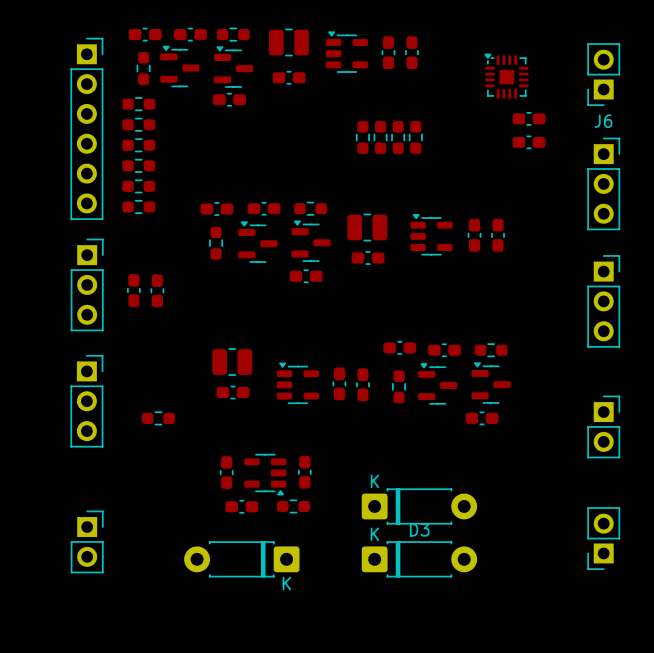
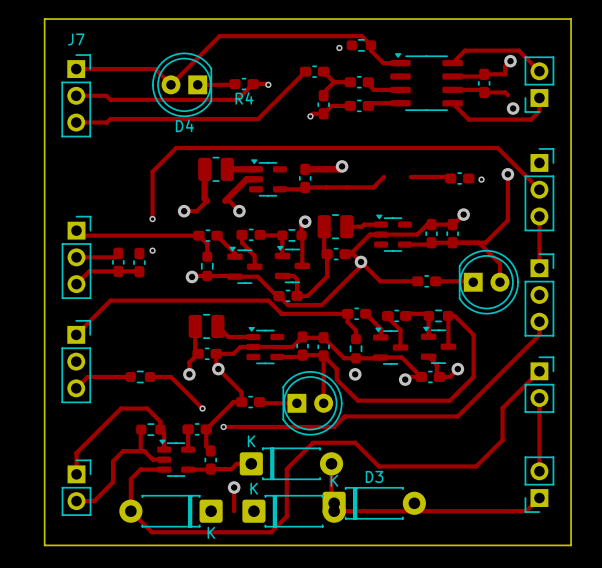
board edge: none -> (44, 19) (571, 19) (571, 545) (44, 545) (44, 19)
part: (145, 34) -> none
part: (190, 34) -> none
part: (233, 34) -> none
part footprint: [405, 36, 419, 70] -> [346, 39, 377, 52]
part: (288, 42) -> none
via: none -> (339, 47)
part: (346, 52) -> none
part: (388, 52) -> none
part: (179, 66) -> none
track: none -> (510, 61) (505, 66) (505, 74) (452, 76)
via: none -> (510, 61)
part: (233, 67) -> none
part: (143, 68) -> none
track: none -> (400, 63) (383, 63) (371, 50) (371, 45) (361, 36) (219, 36) (170, 84) (155, 69) (76, 69)
track: none -> (452, 63) (465, 50) (518, 50) (539, 71)
part position: (603, 74) -> (539, 84)
part: (506, 76) -> none
part: (289, 77) -> none
track: none -> (305, 71) (258, 119) (110, 119) (106, 122) (76, 122)
part: none -> (314, 71)
track: none -> (323, 71) (334, 82)
track: none -> (334, 82) (323, 92) (323, 95)
track: none -> (334, 82) (350, 82)
part: none -> (359, 82)
track: none -> (368, 82) (373, 89) (400, 89)
part: none -> (426, 81)
part: none -> (484, 83)
track: none -> (234, 84) (197, 84)
R4: none -> (244, 84)
D4: none -> (182, 84)
track: none -> (268, 84) (253, 84) (237, 99) (110, 99) (106, 95) (76, 95)
via: none -> (268, 84)
track: none -> (452, 89) (481, 89) (484, 92) (505, 92) (508, 95)
part: (229, 99) -> none
J7: none -> (76, 95)
part: (138, 104) -> none
track: none -> (539, 98) (539, 111) (531, 119) (468, 119) (452, 103)
track: none -> (400, 103) (371, 103) (368, 105)
part: none -> (323, 104)
track: none -> (350, 105) (331, 105) (323, 113) (313, 113) (310, 116)
part: none -> (359, 105)
part: (528, 118) -> none
via: none -> (513, 108)
part: (138, 124) -> none
via: none -> (310, 116)
part: (86, 128) -> none
part: (362, 137) -> none
part: (380, 137) -> none
part: (398, 137) -> none
part: (415, 137) -> none
part: (528, 142) -> none
part: (138, 145) -> none
part: (138, 165) -> none
track: none -> (342, 166) (339, 169) (305, 169)
via: none -> (342, 166)
J6: (603, 183) -> none
part: (138, 186) -> none
track: none -> (204, 169) (204, 198) (207, 200) (196, 211) (184, 211)
part: none -> (215, 169)
track: none -> (227, 169) (255, 169)
track: none -> (507, 174) (507, 220) (485, 242) (404, 244)
via: none -> (507, 174)
track: none -> (384, 176) (373, 187) (279, 189)
track: none -> (410, 176) (450, 178)
part: none -> (267, 177)
part: none -> (305, 178)
part: none -> (459, 178)
track: none -> (255, 179) (246, 179) (225, 200) (229, 200) (239, 211)
via: none -> (481, 179)
part: (138, 206) -> none
part: (264, 208) -> none
part position: (310, 208) -> (291, 235)
part: (216, 209) -> none
track: none -> (539, 189) (497, 148) (176, 148) (152, 171) (152, 219)
part: none -> (539, 189)
part: (367, 227) -> none
via: none -> (184, 211)
via: none -> (239, 211)
part position: (431, 234) -> (392, 233)
part: (474, 235) -> none
part: (498, 235) -> none
track: none -> (463, 214) (453, 224) (427, 224) (417, 234) (369, 234) (350, 254)
via: none -> (463, 214)
track: none -> (539, 216) (539, 268)
part: (311, 241) -> none
via: none -> (152, 219)
part: (257, 242) -> none
part position: (216, 243) -> (207, 266)
track: none -> (305, 221) (301, 225) (302, 265)
via: none -> (305, 221)
track: none -> (381, 224) (346, 226)
track: none -> (324, 226) (327, 276) (307, 295) (297, 295) (297, 279) (293, 275) (282, 275)
part footprint: [351, 251, 385, 265] -> [317, 214, 354, 240]
track: none -> (76, 230) (81, 235) (198, 235) (207, 244) (207, 256)
part: none -> (431, 233)
part: none -> (452, 233)
track: none -> (242, 234) (242, 242) (254, 255) (254, 266)
part: none -> (251, 234)
track: none -> (260, 234) (282, 235) (282, 255)
part: none -> (207, 235)
track: none -> (217, 235) (234, 253) (234, 256)
track: none -> (478, 242) (499, 263) (499, 282)
part: (306, 276) -> none
via: none -> (152, 250)
track: none -> (118, 253) (114, 257) (76, 257)
part: none -> (336, 254)
track: none -> (345, 256) (345, 254) (353, 254) (380, 281) (417, 281)
track: none -> (361, 261) (361, 265) (321, 305) (288, 305) (257, 276) (192, 276)
via: none -> (361, 261)
part: none -> (292, 264)
part: none -> (244, 265)
track: none -> (139, 271) (89, 271) (76, 284)
part position: (603, 301) -> (539, 294)
via: none -> (192, 276)
part: none -> (426, 281)
track: none -> (435, 281) (472, 281)
part: none -> (488, 282)
part: none -> (287, 295)
track: none -> (365, 313) (380, 328) (380, 337)
track: none -> (389, 313) (389, 319) (400, 330) (400, 347)
track: none -> (407, 313) (426, 313) (428, 315) (428, 336)
track: none -> (539, 321) (539, 334) (457, 416) (344, 416) (334, 426) (223, 426)
track: none -> (195, 326) (195, 350) (198, 353) (189, 362) (189, 374)
track: none -> (217, 326) (228, 336) (253, 336)
track: none -> (76, 334) (110, 300) (268, 300) (281, 313) (347, 313) (347, 321) (356, 330) (356, 339)
track: none -> (448, 346) (448, 315) (454, 315) (473, 334) (473, 376) (449, 400) (357, 400) (336, 379) (336, 369) (322, 355) (277, 356)
track: none -> (323, 355) (323, 403)
track: none -> (428, 356) (436, 364) (436, 374) (439, 376) (449, 376) (457, 369)
via: none -> (218, 369)
via: none -> (457, 369)
track: none -> (539, 371) (502, 408) (502, 440) (476, 466) (378, 466) (355, 442) (313, 442) (286, 469) (286, 516) (270, 532) (151, 532) (130, 511) (130, 479) (140, 469) (164, 469)
via: none -> (189, 374)
via: none -> (355, 374)
track: none -> (130, 376) (87, 376) (76, 388)
track: none -> (149, 376) (170, 376) (202, 408)
track: none -> (405, 379) (407, 376) (421, 376) (401, 357) (344, 358) (323, 337) (302, 336) (292, 346) (240, 346) (233, 353) (216, 353) (216, 366) (241, 392) (241, 402) (233, 402) (206, 429) (206, 446) (210, 450)
via: none -> (405, 379)
track: none -> (539, 398) (539, 471)
track: none -> (259, 402) (296, 403)
part: none -> (312, 403)
via: none -> (202, 408)
part rotation: 0° (226, 472) -> 90° clockwise (197, 429)
part rotation: 0° (304, 472) -> 90° clockwise (250, 402)
part position: (304, 472) -> (250, 402)
via: none -> (223, 426)
part rotation: 0° (265, 474) -> 180° (176, 458)
part position: (265, 474) -> (176, 458)
track: none -> (188, 429) (188, 449)
track: none -> (141, 429) (140, 451)
part: none -> (150, 429)
track: none -> (164, 449) (164, 433) (160, 429) (160, 421) (147, 408) (120, 408) (76, 453) (76, 474)
part rotation: 0° (241, 506) -> 90° clockwise (210, 460)
part: (293, 506) -> none
part: (419, 506) -> none
track: none -> (164, 459) (152, 459) (144, 451) (123, 451) (113, 461) (113, 482) (94, 501) (76, 501)
track: none -> (251, 463) (236, 463) (231, 469) (188, 469)
part: none -> (291, 463)
track: none -> (331, 463) (331, 508) (334, 511) (526, 511) (539, 498)
track: none -> (234, 487) (234, 511)
via: none -> (234, 487)
part: (241, 559) -> none
part: none -> (170, 511)
part: none -> (294, 511)

